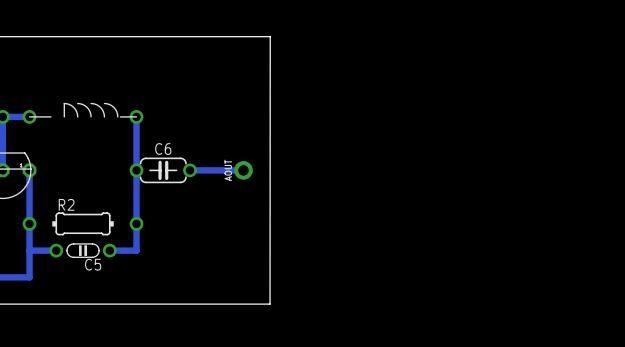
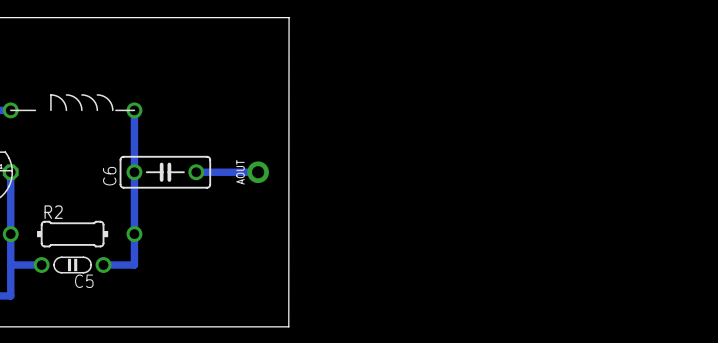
C6 name position: C6 (163, 149) -> C6 (109, 176)
C6 footprint: [129, 157, 197, 184] -> [119, 155, 212, 189]

